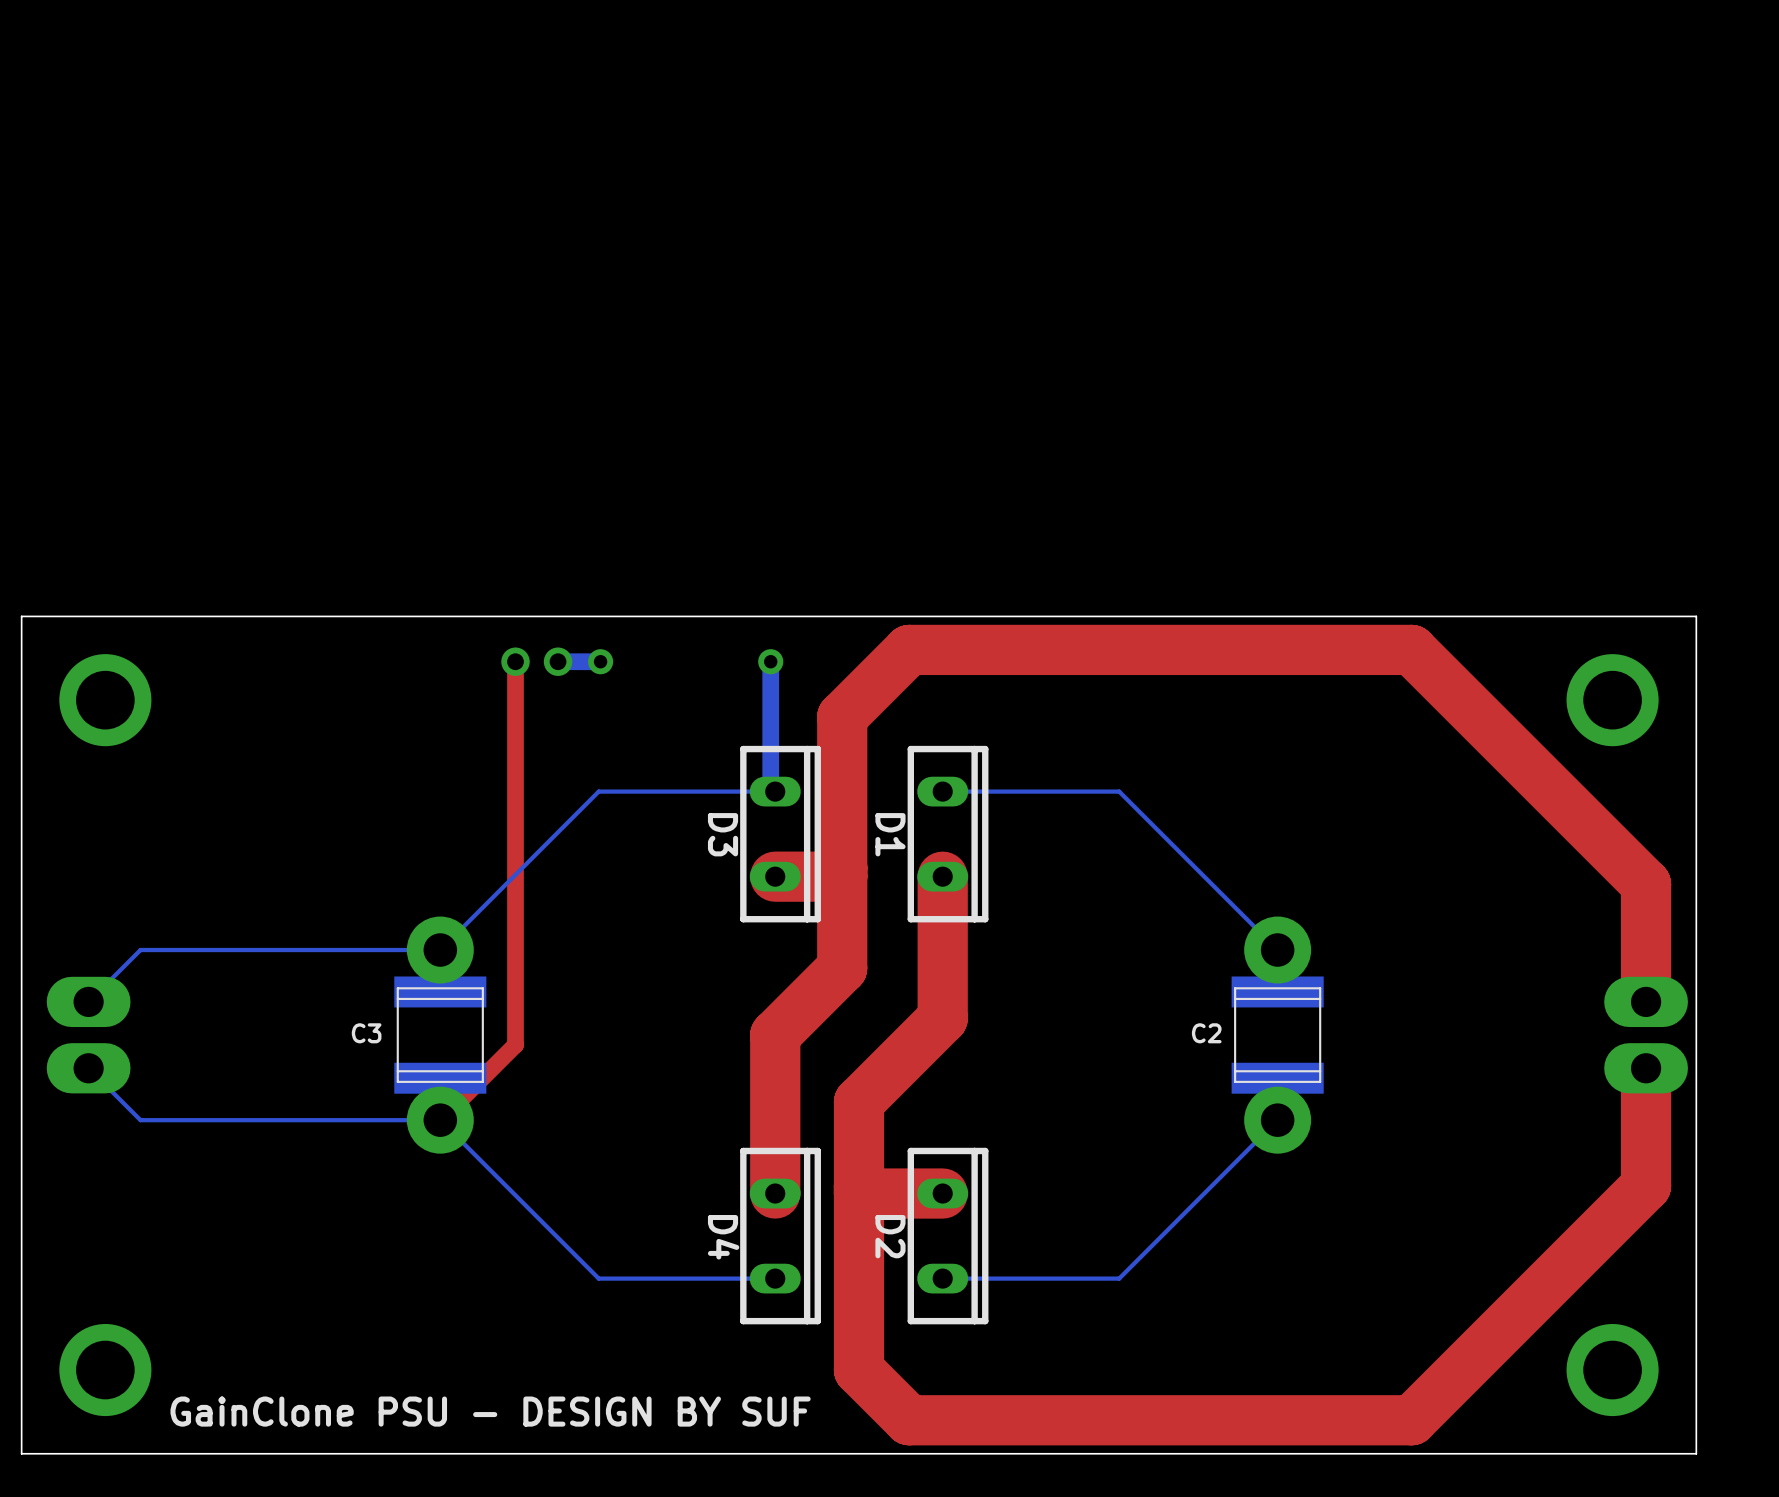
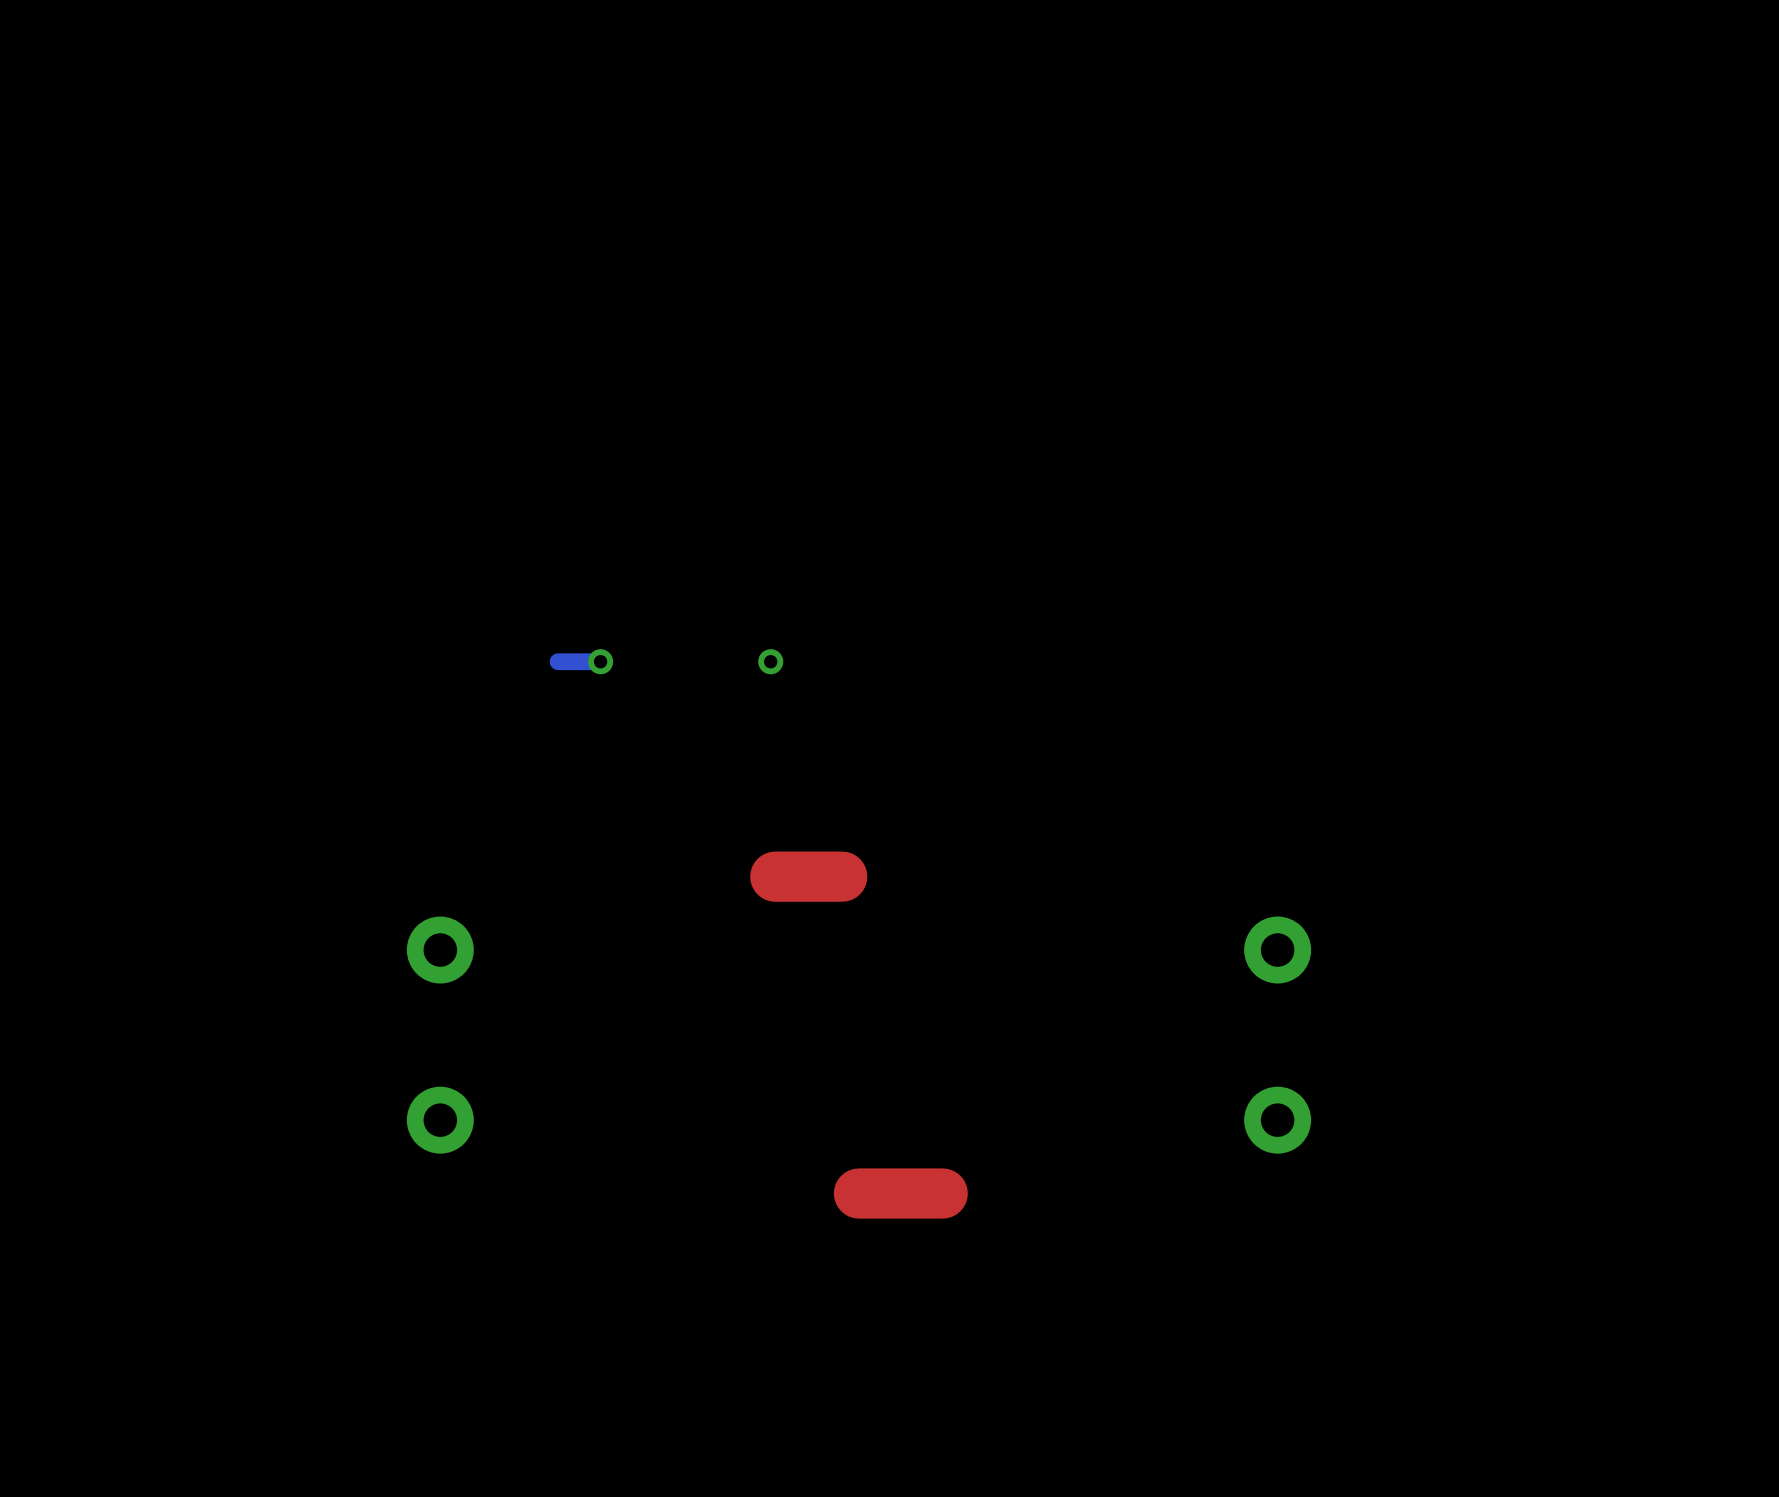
board edge: (1696, 616) (1696, 1453) (21, 1453) (21, 616) (1696, 616) -> none
top track: (515, 661) (515, 1044) (440, 1120) -> none
part: (536, 661) -> none
bottom track: (770, 661) (770, 787) (775, 791) (598, 791) (440, 950) -> none
part: (105, 700) -> none
part: (1612, 700) -> none
bottom track: (942, 791) (1119, 791) (1277, 950) (1277, 991) -> none
D3: (780, 834) -> none
D1: (948, 834) -> none
top track: (942, 876) (942, 1018) (858, 1102) (858, 1370) (909, 1420) (1411, 1420) (1646, 1185) (1646, 1068) -> none
bottom track: (440, 950) (140, 950) (88, 1001) -> none
top track: (1646, 1001) (1646, 884) (1411, 649) (909, 649) (842, 716) (842, 968) (775, 1035) (775, 1193) -> none
part: (88, 1035) -> none
C3: (440, 1035) -> none
C2: (1277, 1035) -> none
part: (1646, 1035) -> none
bottom track: (88, 1068) (140, 1120) (440, 1120) -> none
bottom track: (1277, 1078) (1277, 1120) (1119, 1278) (942, 1278) -> none
bottom track: (440, 1120) (598, 1278) (775, 1278) -> none
D4: (780, 1236) -> none
D2: (948, 1236) -> none
part: (105, 1370) -> none
part: (1612, 1370) -> none
text: GainClone PSU - DESIGN BY SUF (490, 1411) -> none

